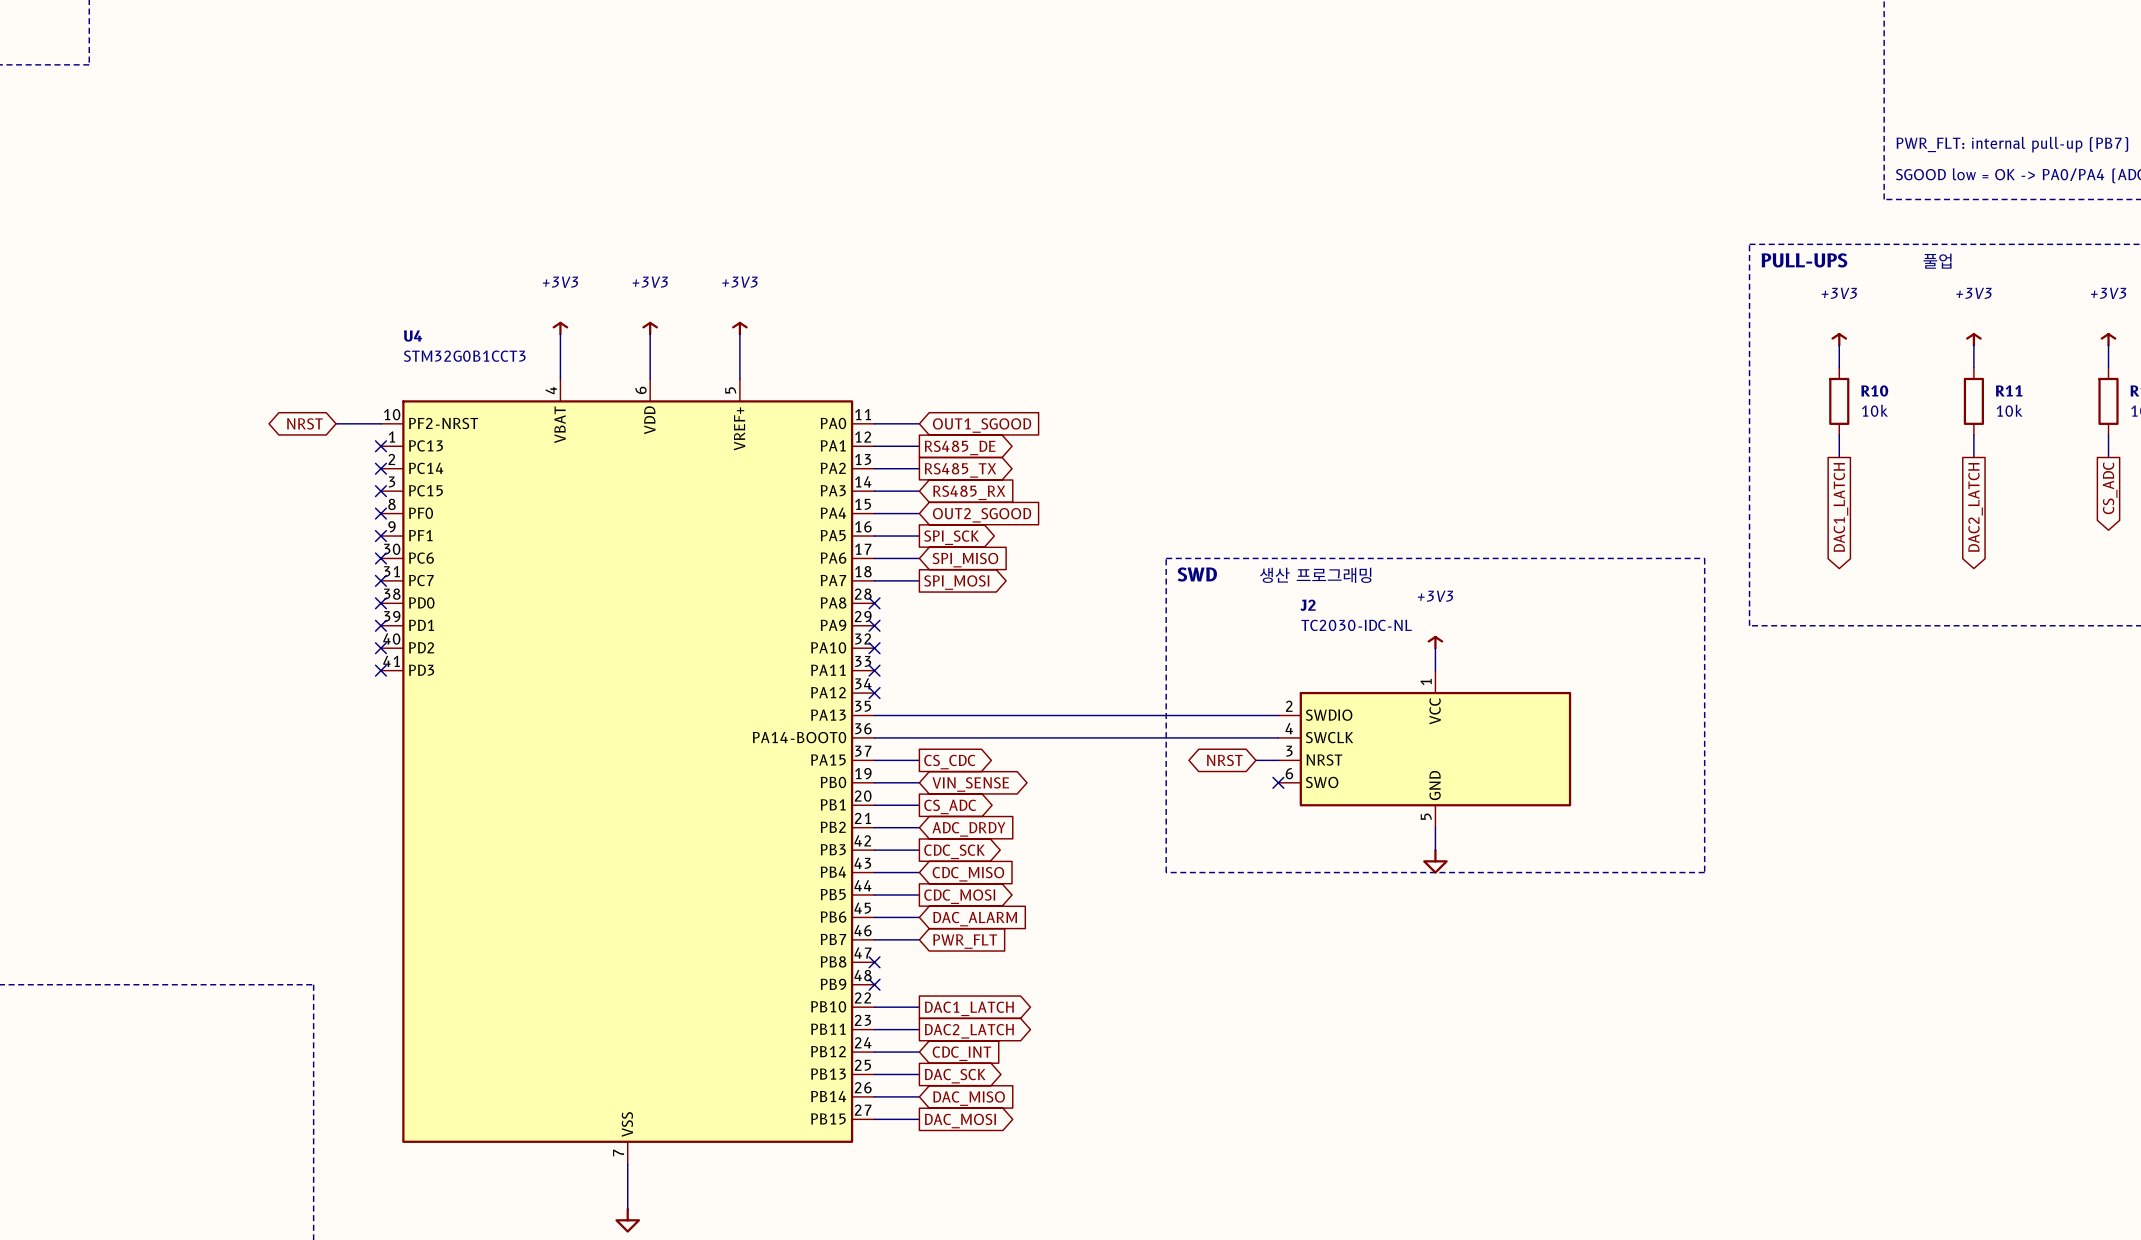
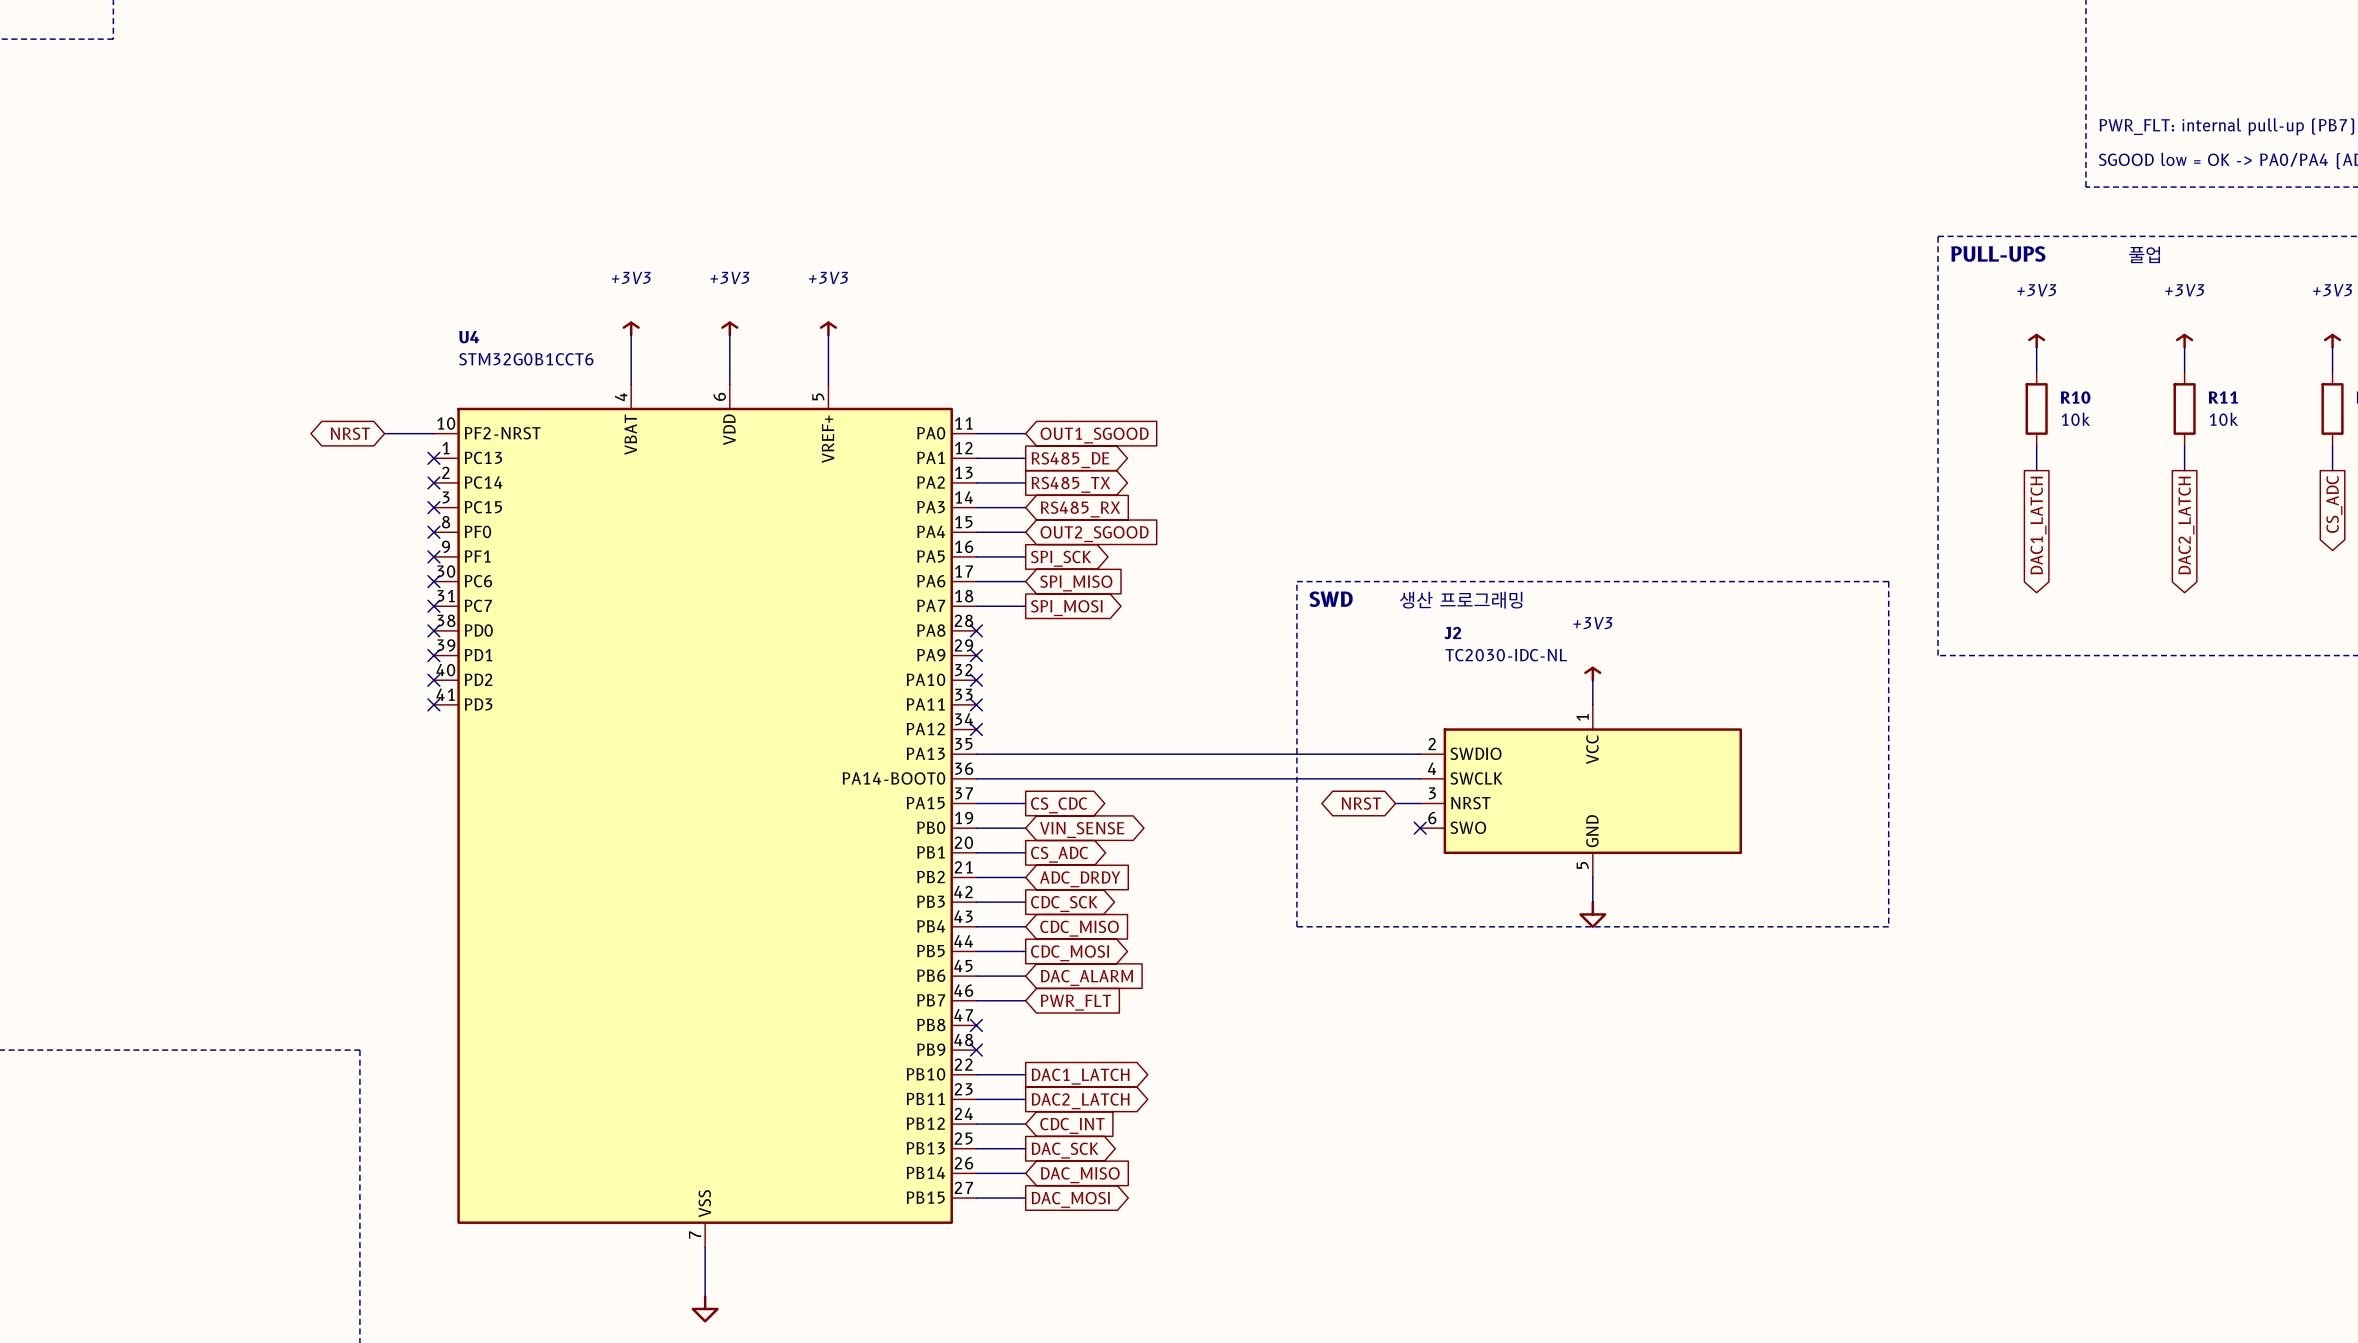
U4 value: STM32G0B1CCT3 (464, 356) -> STM32G0B1CCT6 (526, 359)

